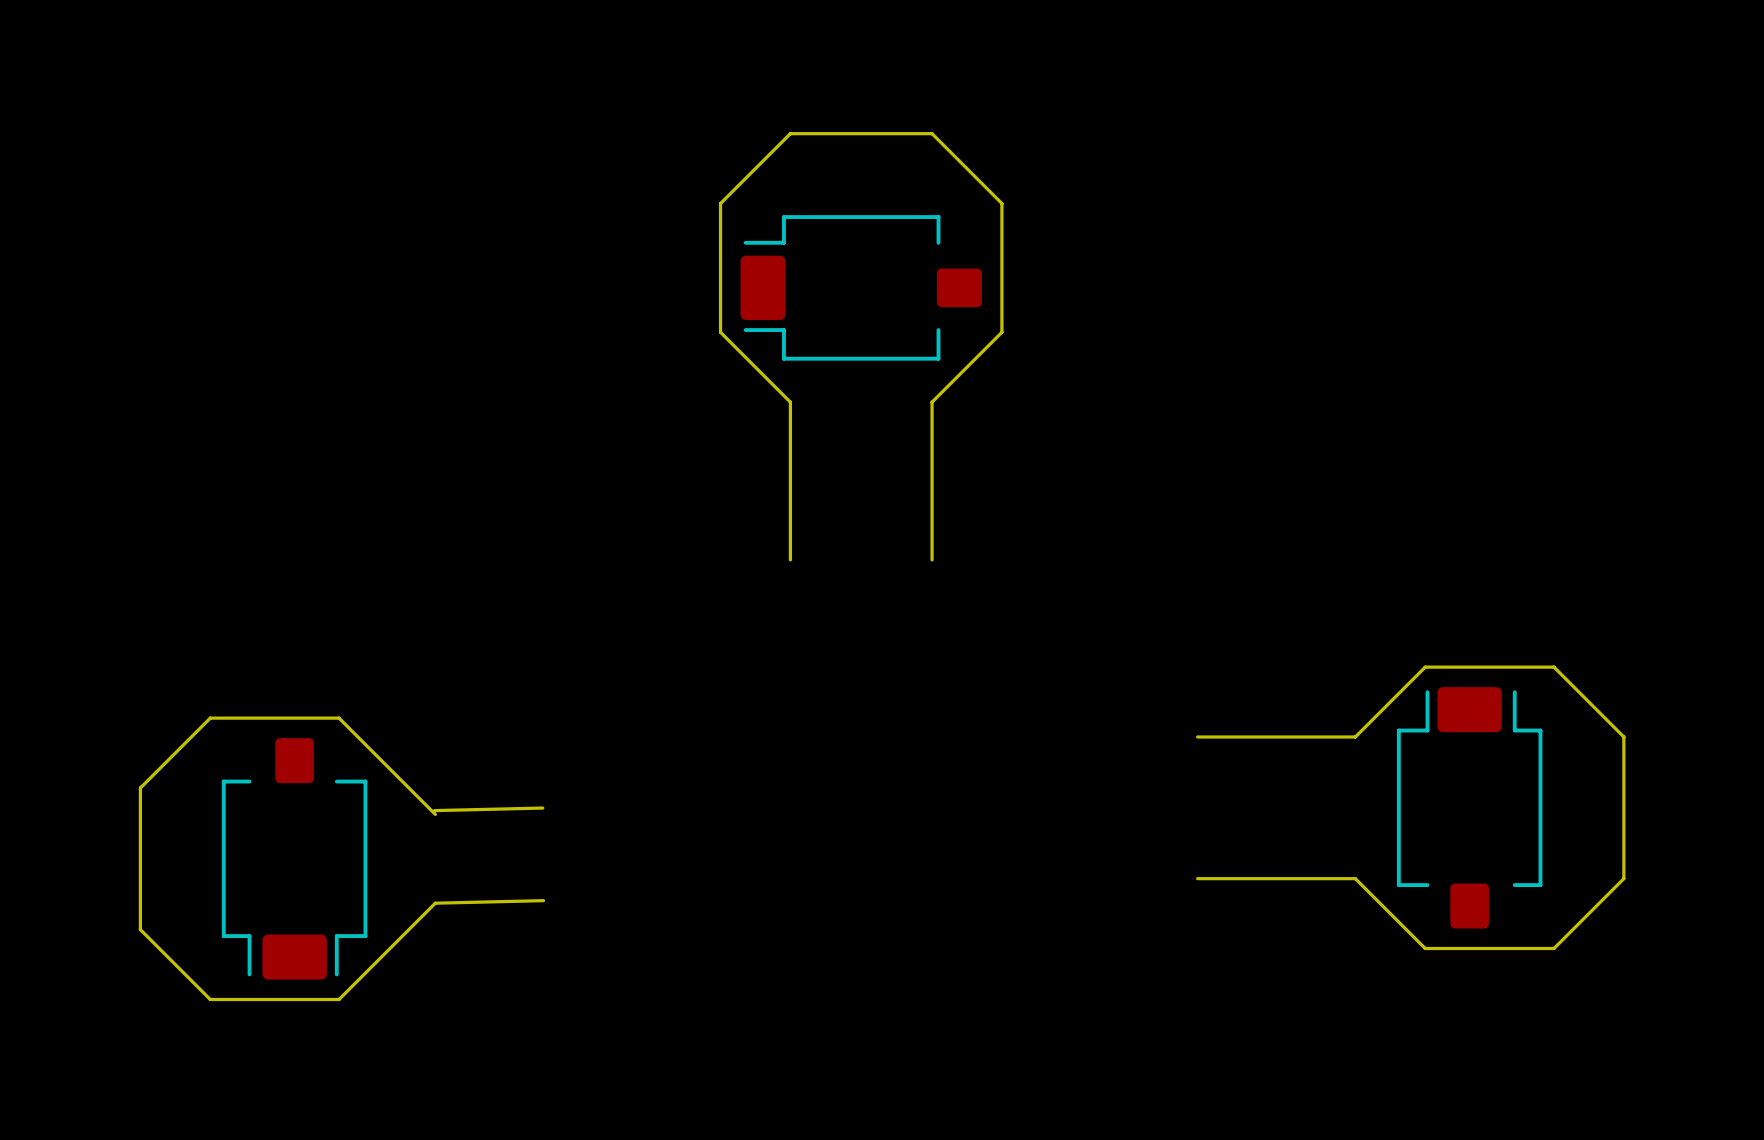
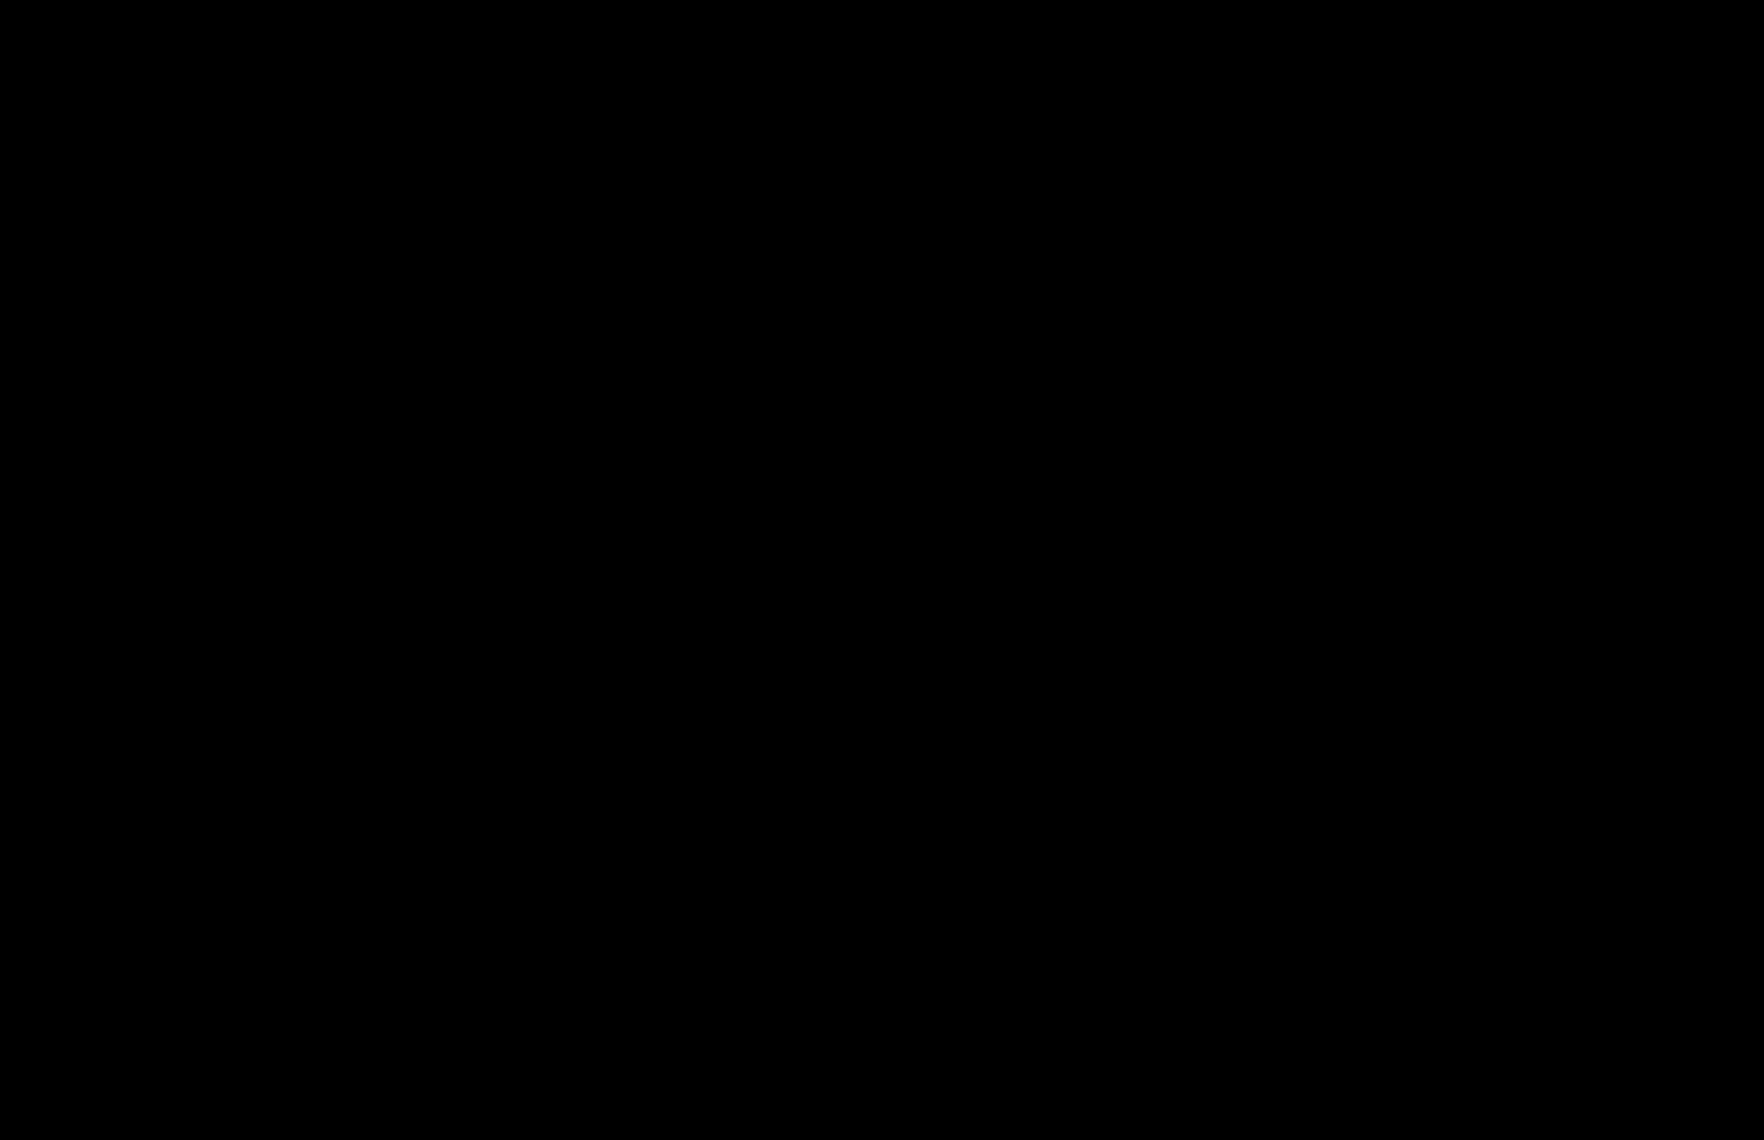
part: (861, 287) -> none
board edge: (790, 559) (790, 402) (720, 332) (720, 203) (790, 133) (932, 133) (1001, 203) (1001, 332) (932, 402) (932, 559) -> none
board edge: (1197, 736) (1355, 736) (1425, 667) (1554, 667) (1623, 736) (1623, 878) (1554, 948) (1425, 948) (1355, 878) (1197, 878) -> none
part: (1469, 807) -> none
board edge: (542, 808) (434, 810) -> none
board edge: (435, 814) (339, 718) (210, 718) (140, 787) (140, 929) (210, 999) (339, 999) (435, 903) (543, 900) -> none
part: (294, 858) -> none

